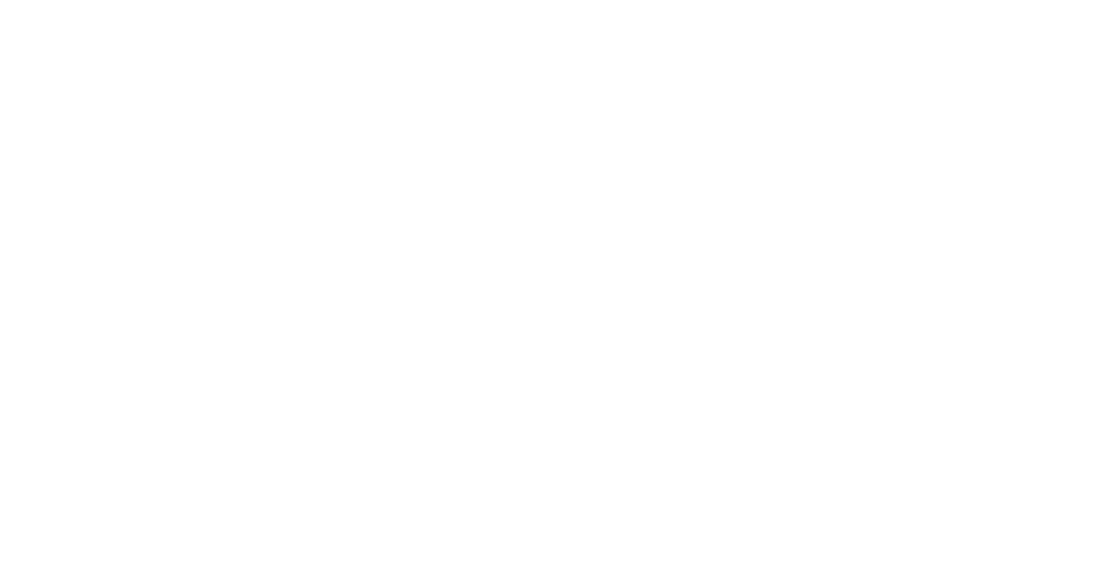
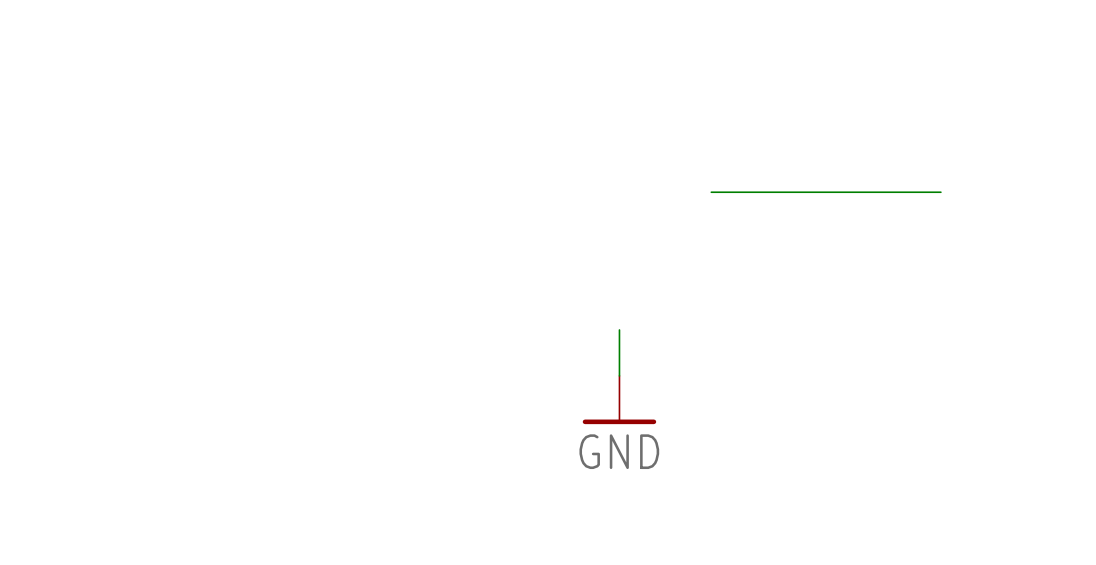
wire: none -> (711, 192) (940, 192)
wire: none -> (619, 329) (619, 375)
power symbol: none -> GND (619, 400)

